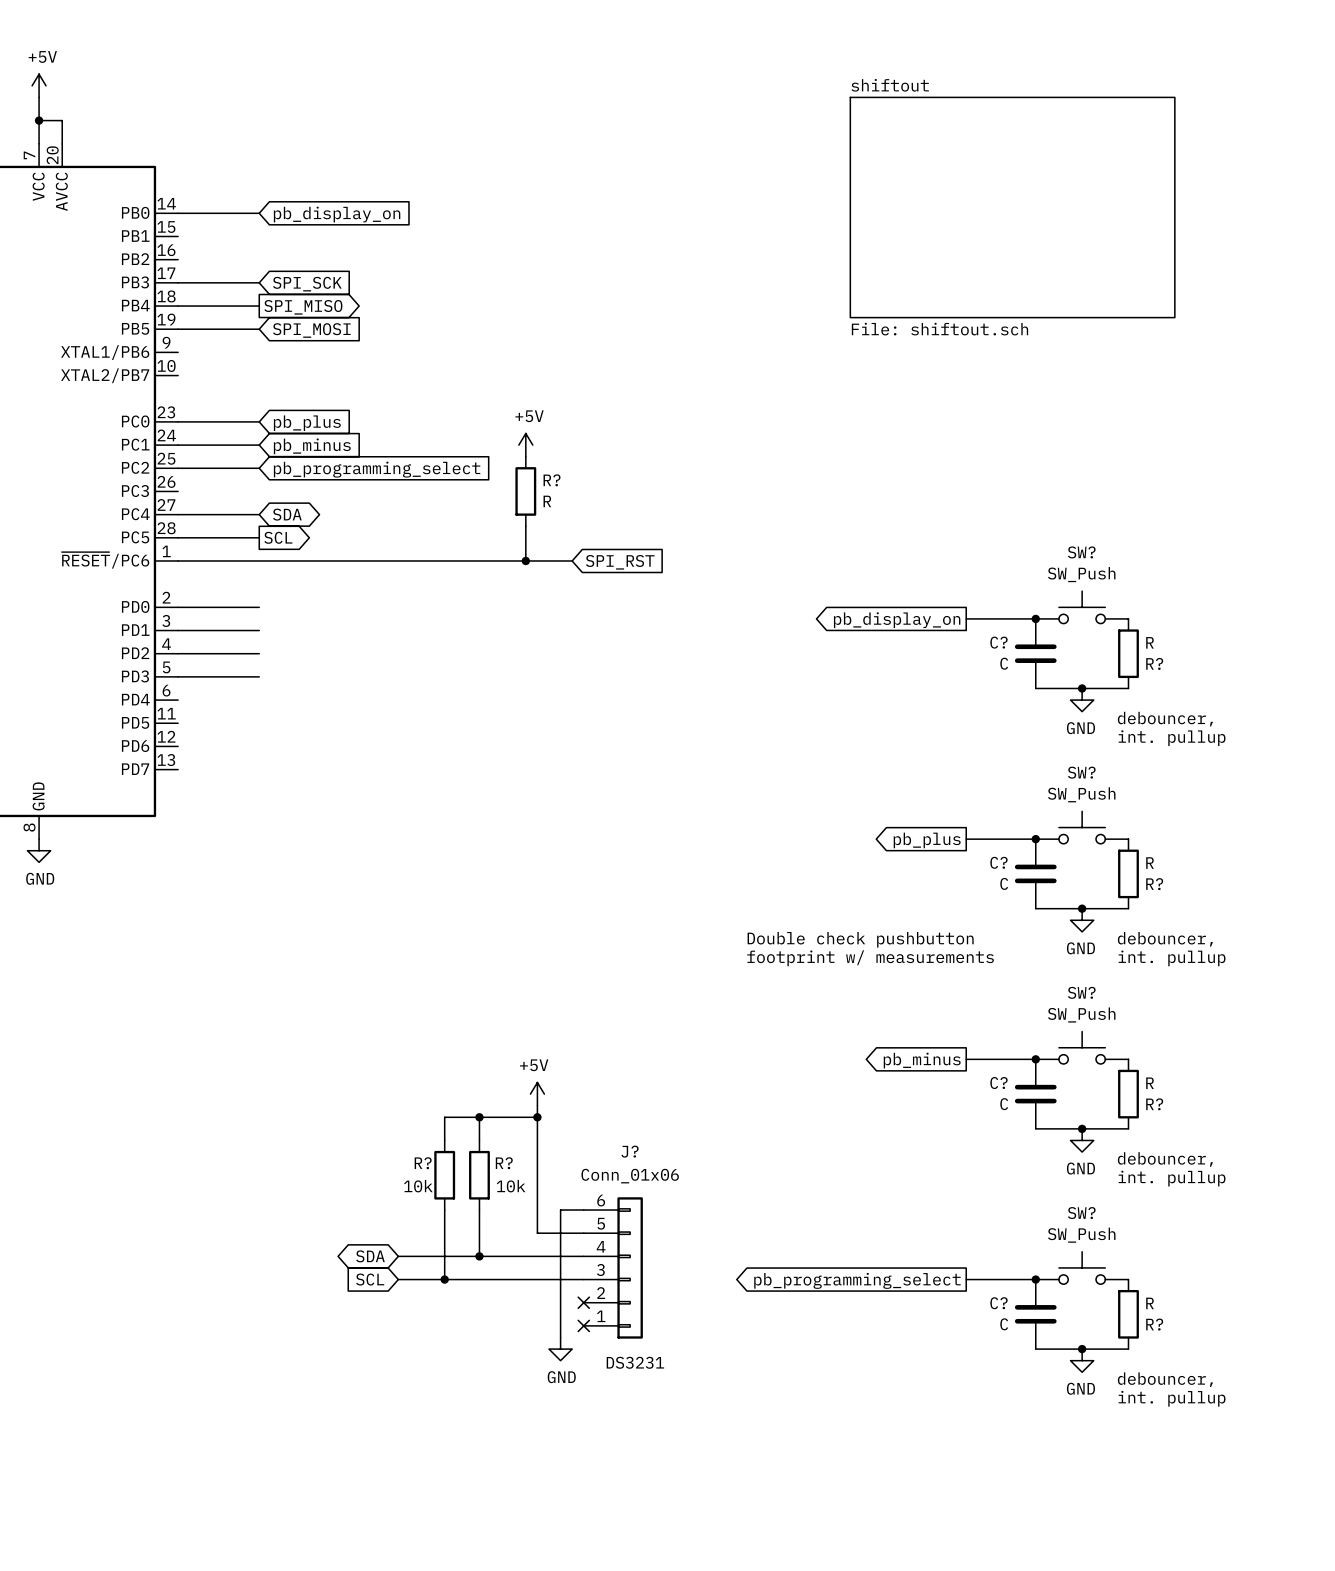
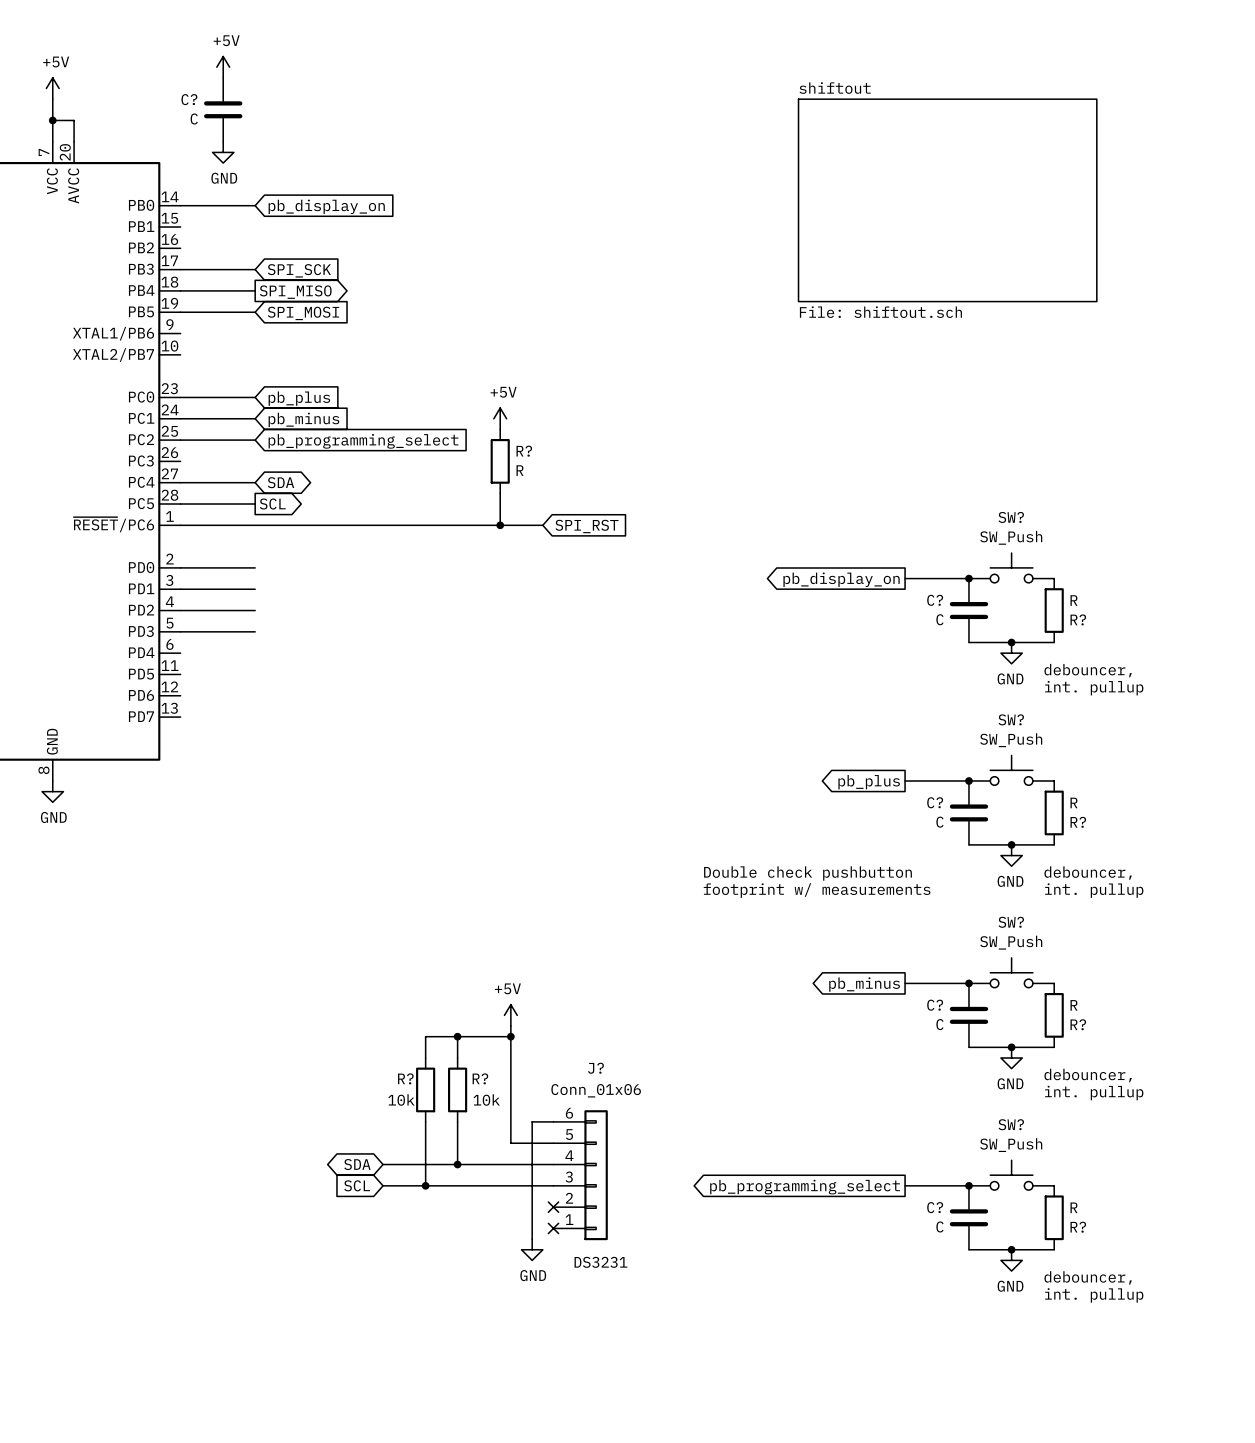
power symbol: none -> +5V (223, 67)
C?: none -> C (223, 109)
power symbol: none -> GND (223, 152)

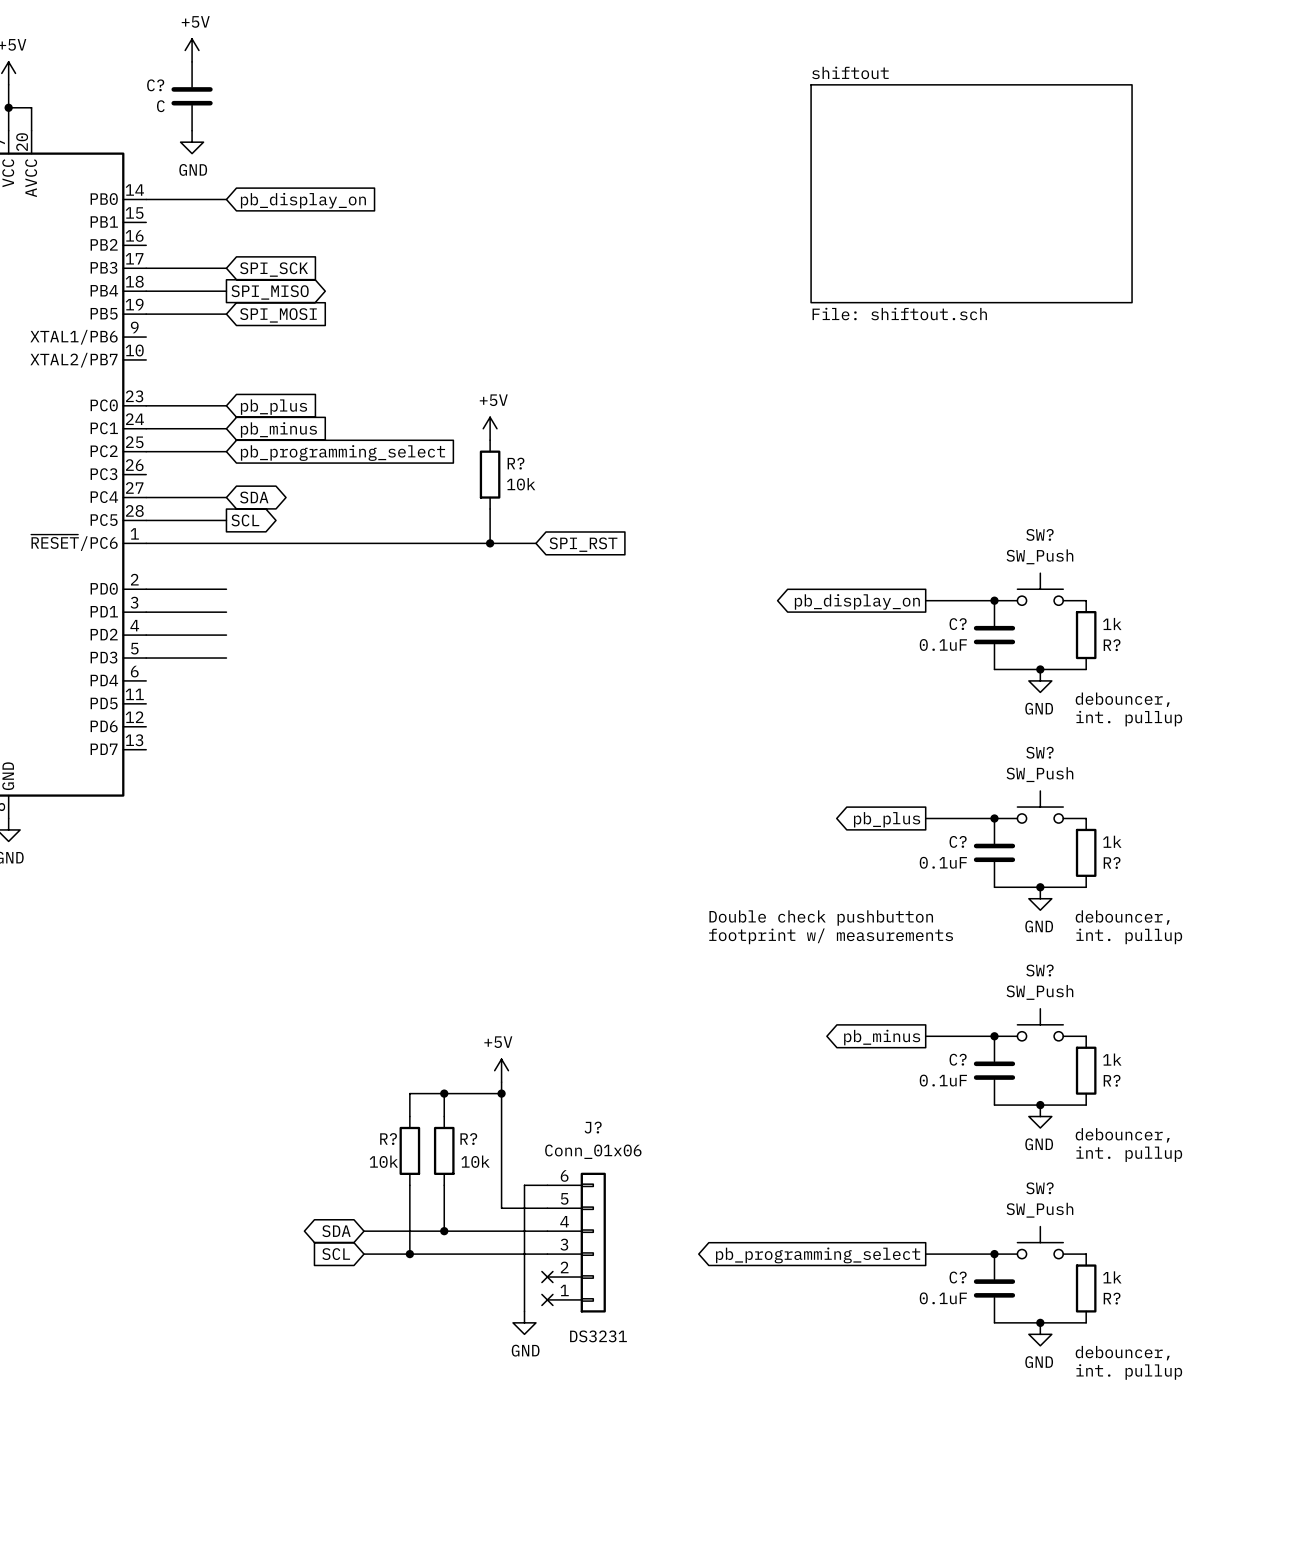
R? value: R (520, 470) -> 10k (521, 484)
R? value: R (1074, 600) -> 1k (1112, 623)
C? value: C (939, 619) -> 0.1uF (943, 644)
R? value: R (1074, 802) -> 1k (1112, 841)
C? value: C (939, 822) -> 0.1uF (943, 862)
R? value: R (1074, 1005) -> 1k (1112, 1059)
C? value: C (939, 1024) -> 0.1uF (943, 1080)
R? value: R (1074, 1207) -> 1k (1112, 1277)
C? value: C (939, 1226) -> 0.1uF (943, 1298)

